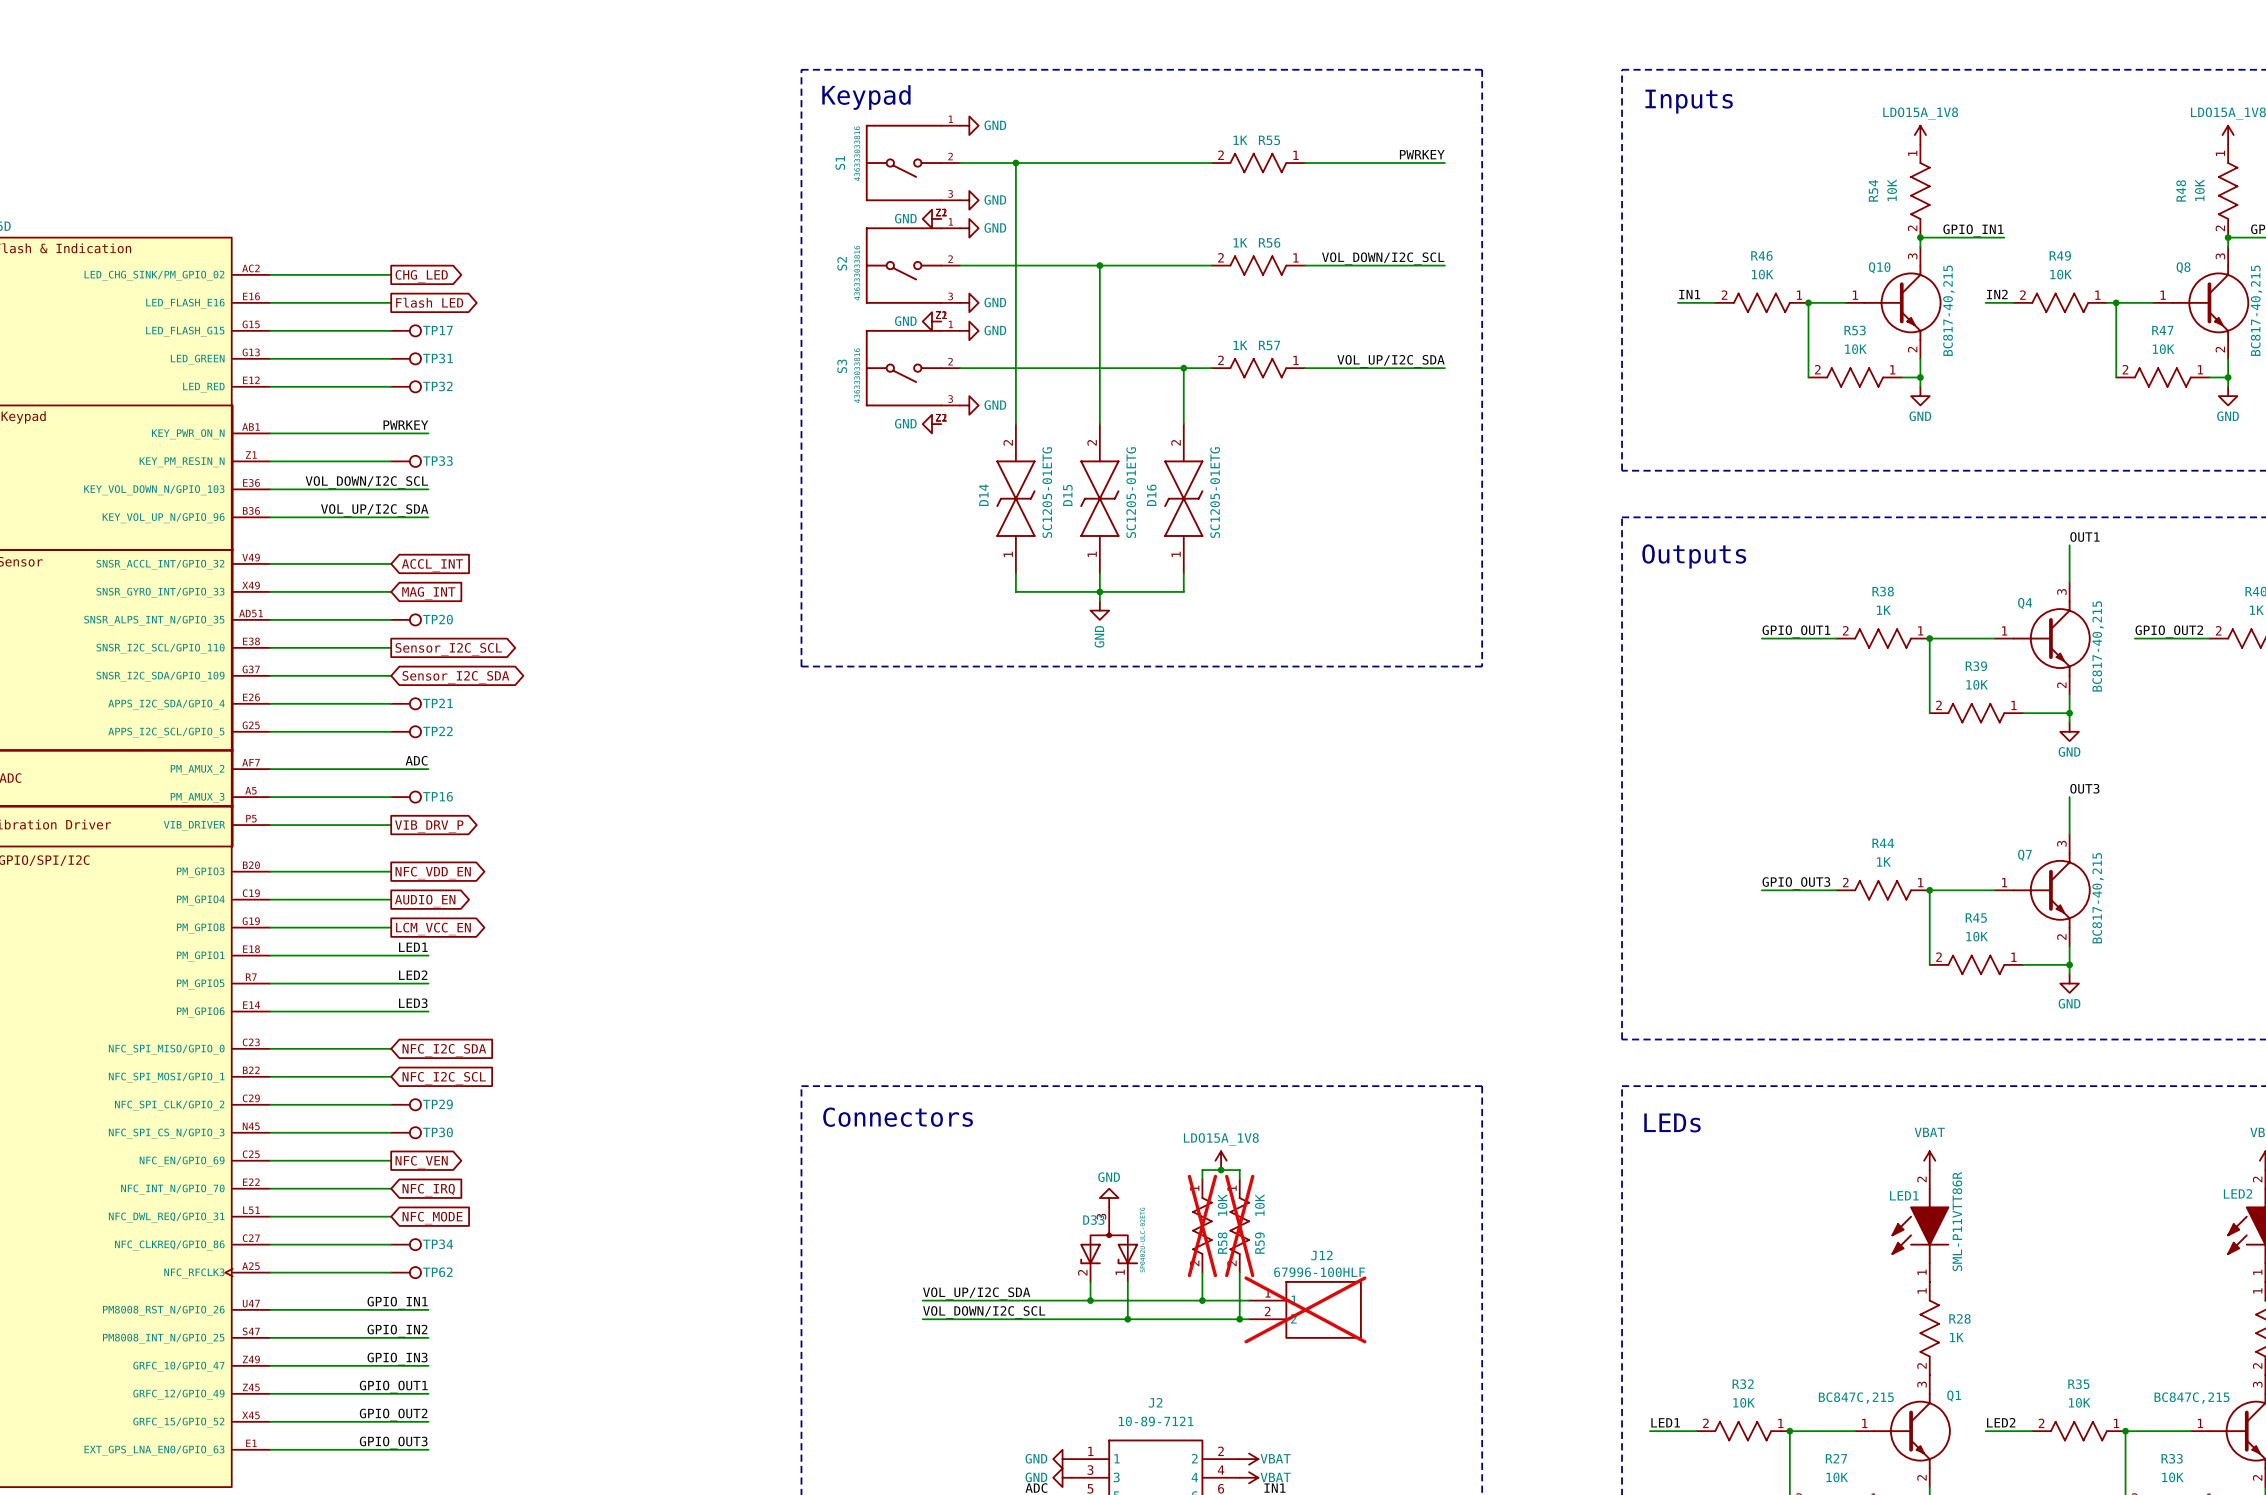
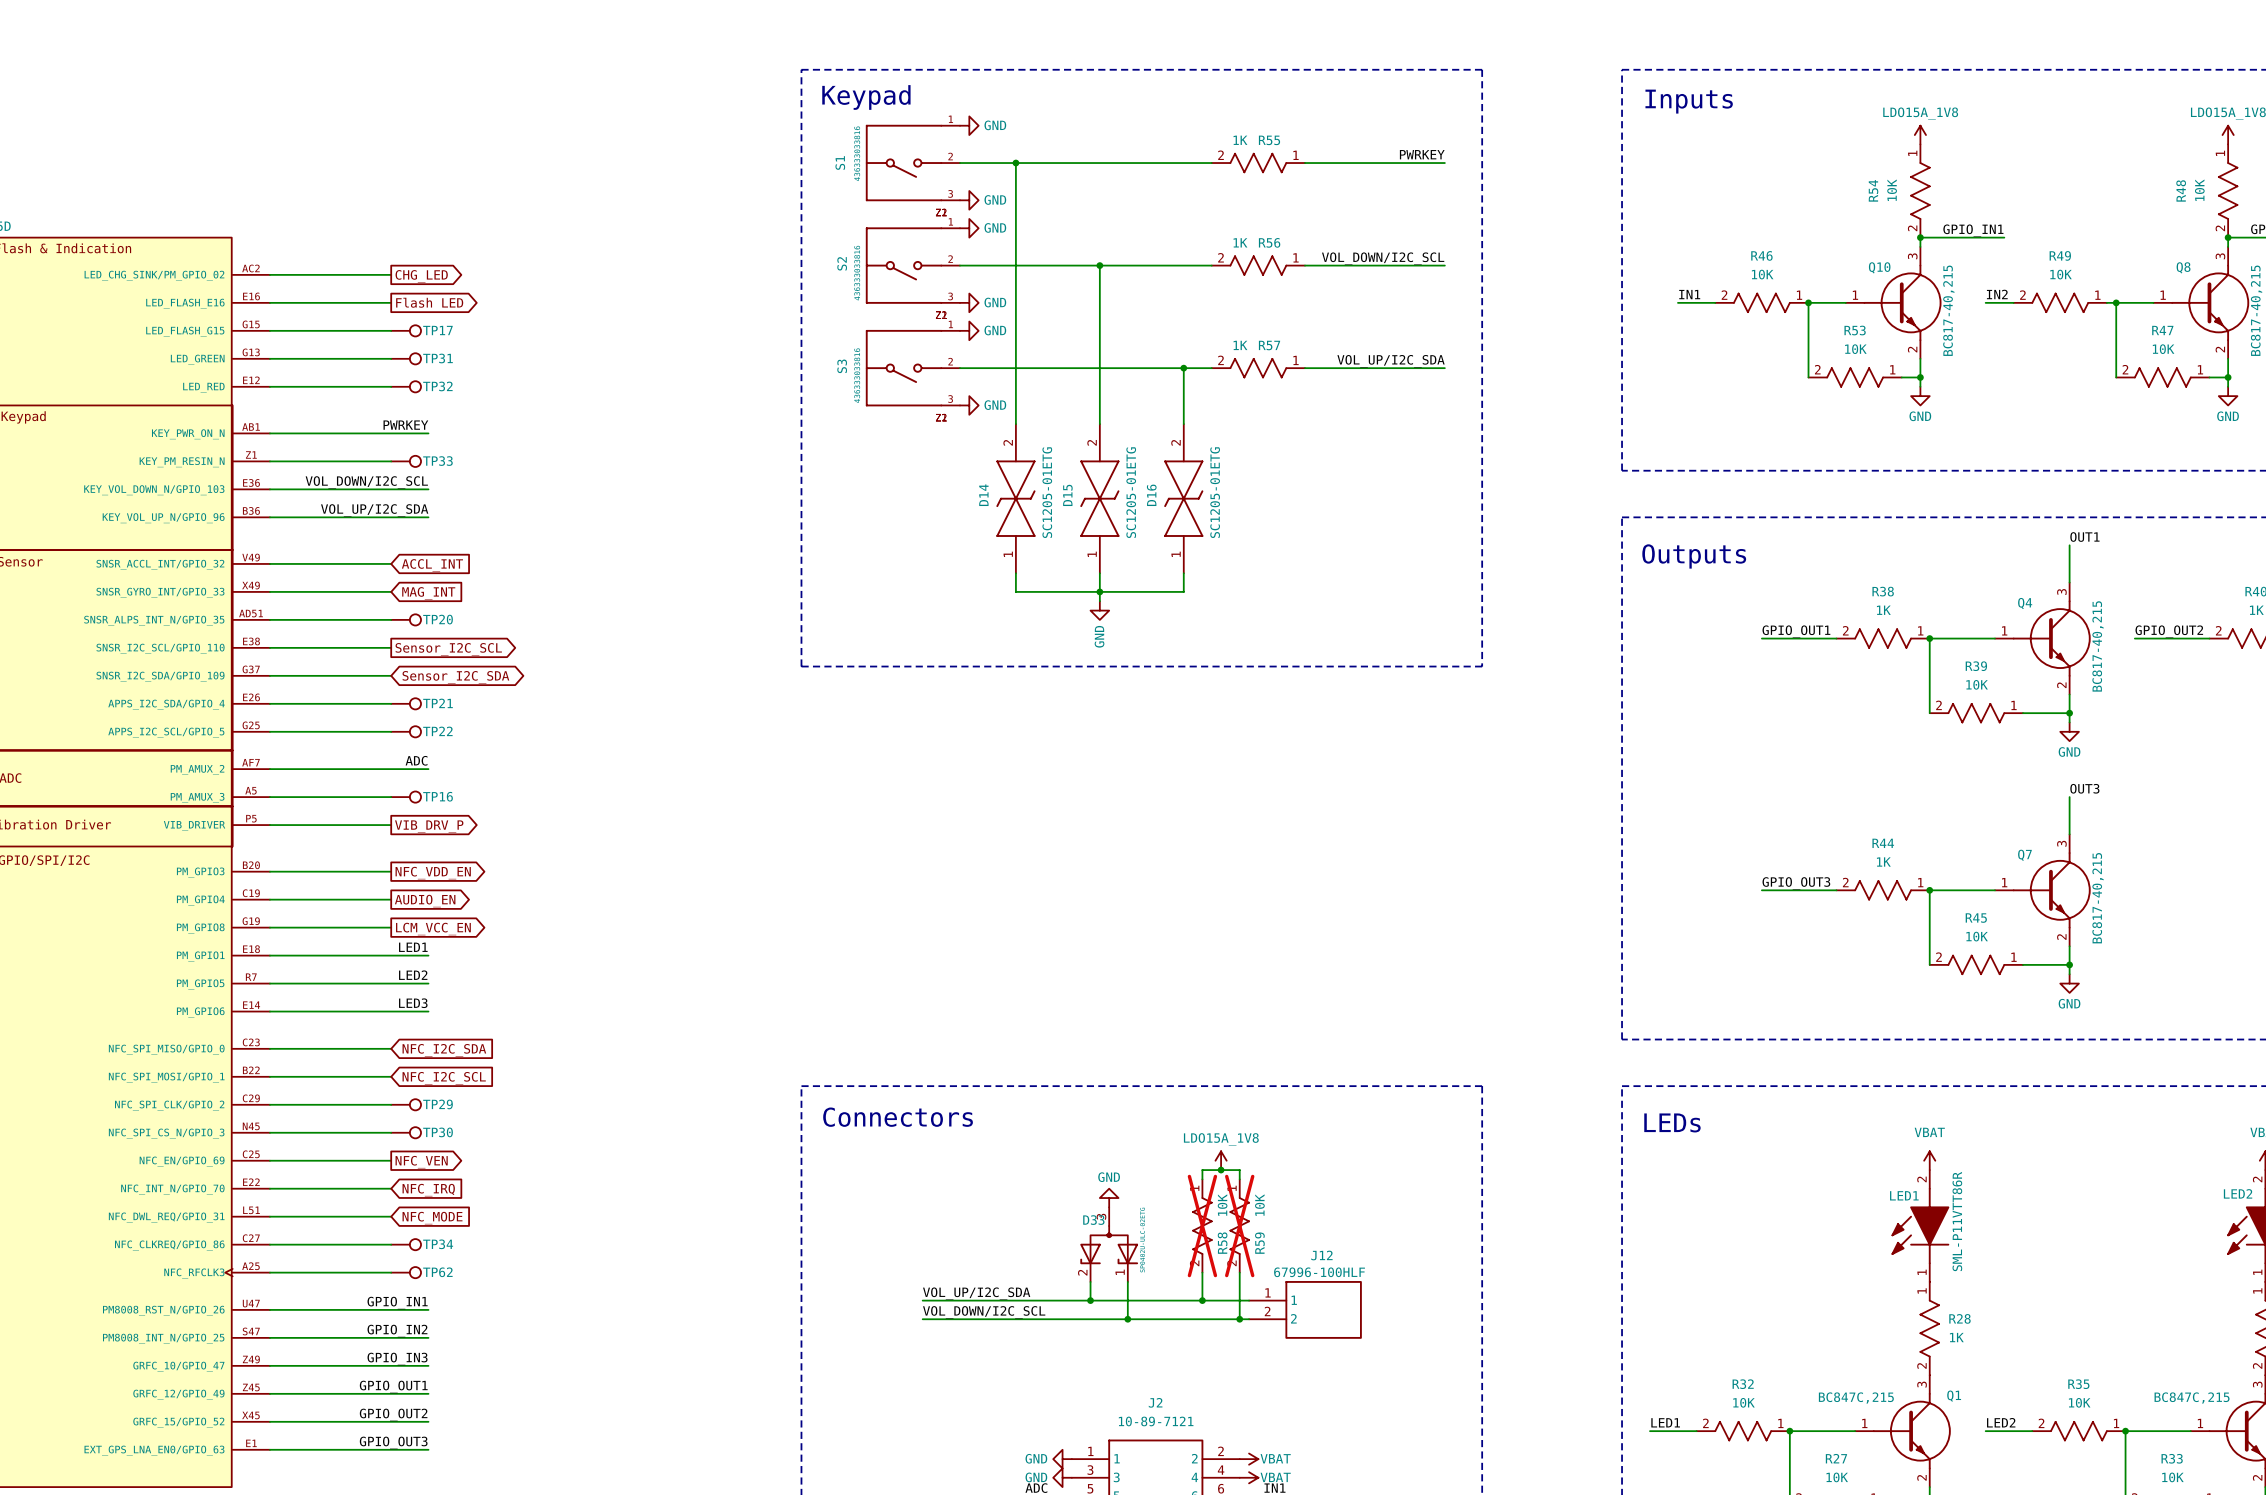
power symbol: GND (932, 218) -> none
power symbol: GND (932, 321) -> none
power symbol: GND (932, 424) -> none
J12 do-not-place cross: (1305, 1309) -> none

